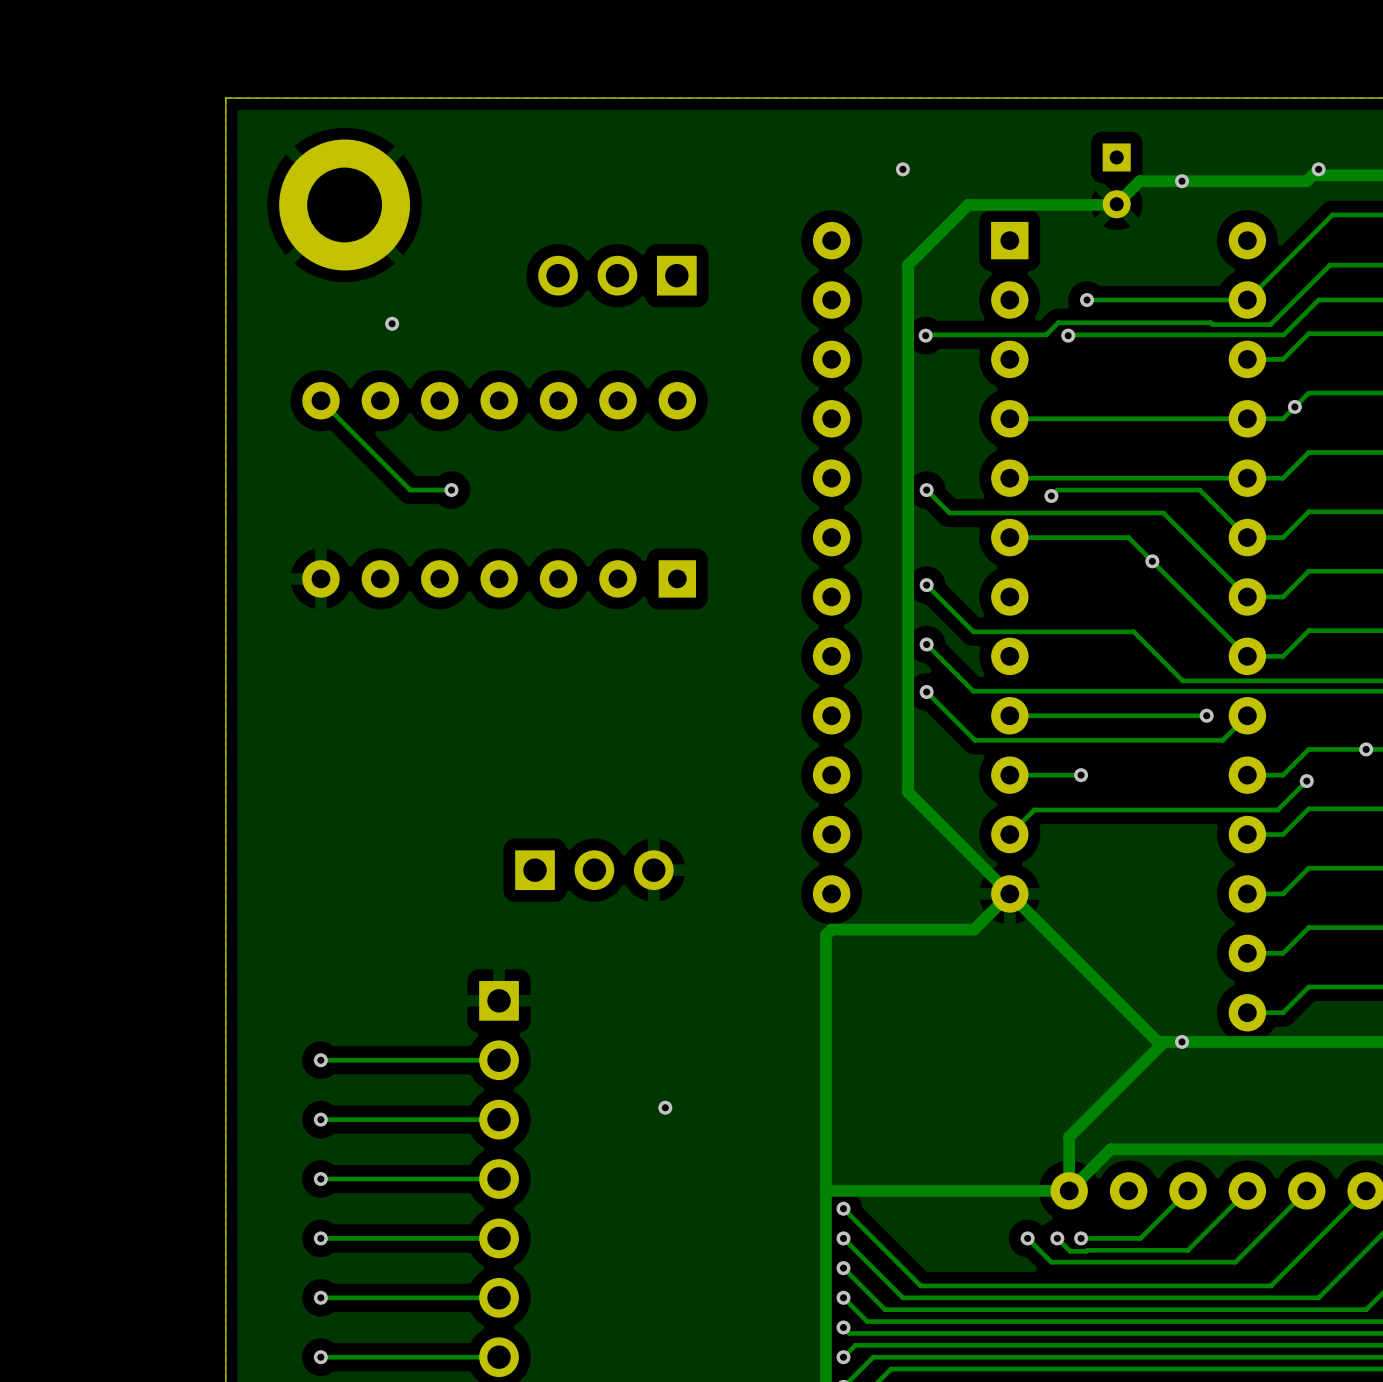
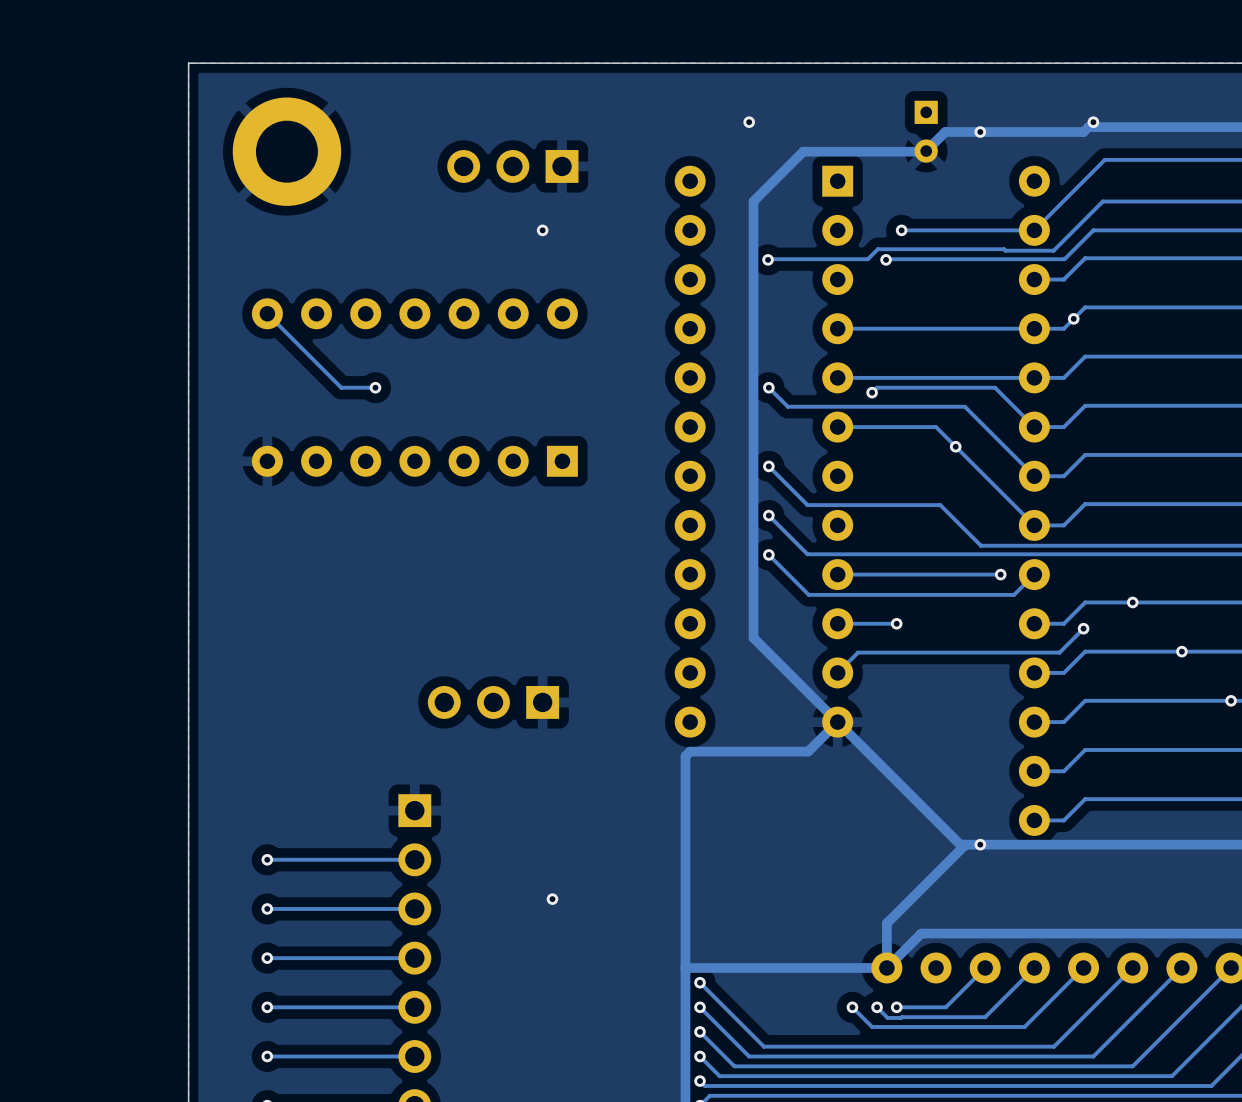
part position: (617, 275) -> (512, 166)
via: none -> (542, 230)
via: (392, 323) -> none
part rotation: 0° (594, 870) -> 180° (493, 702)

